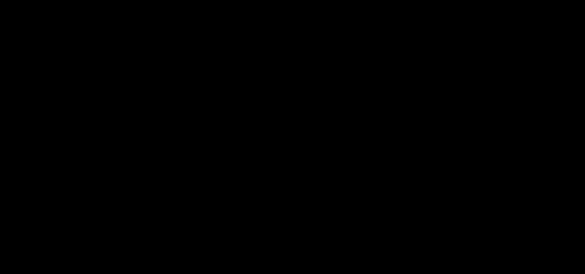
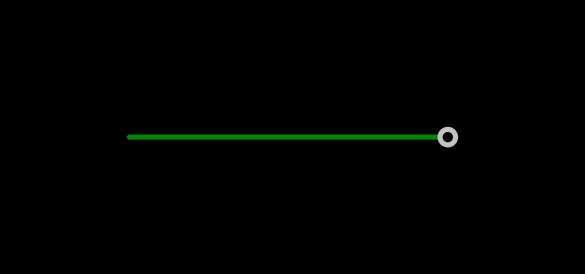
track: none -> (447, 137) (129, 137)
via: none -> (447, 137)

